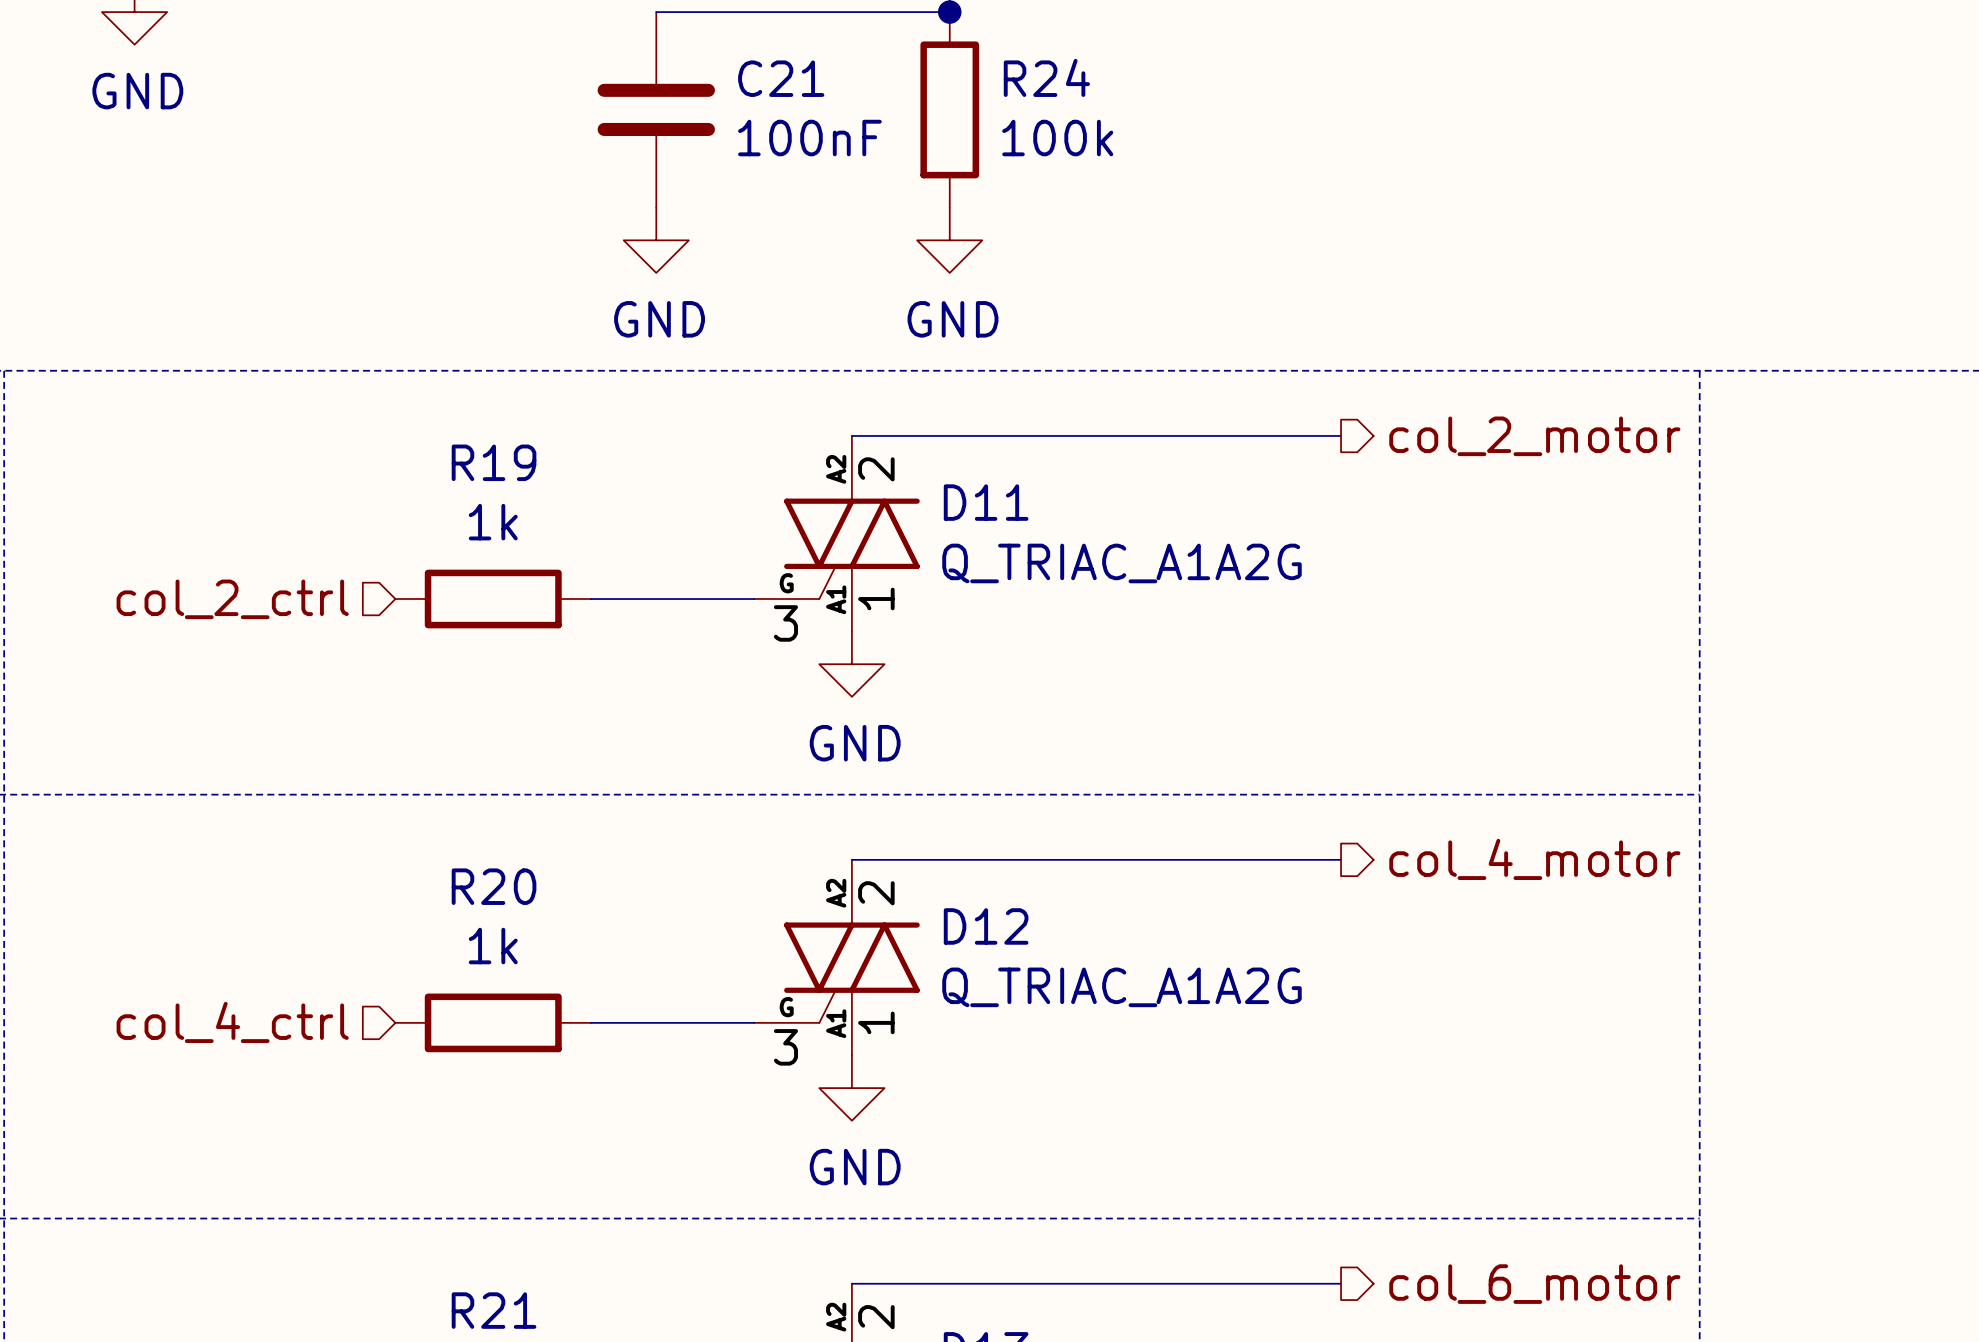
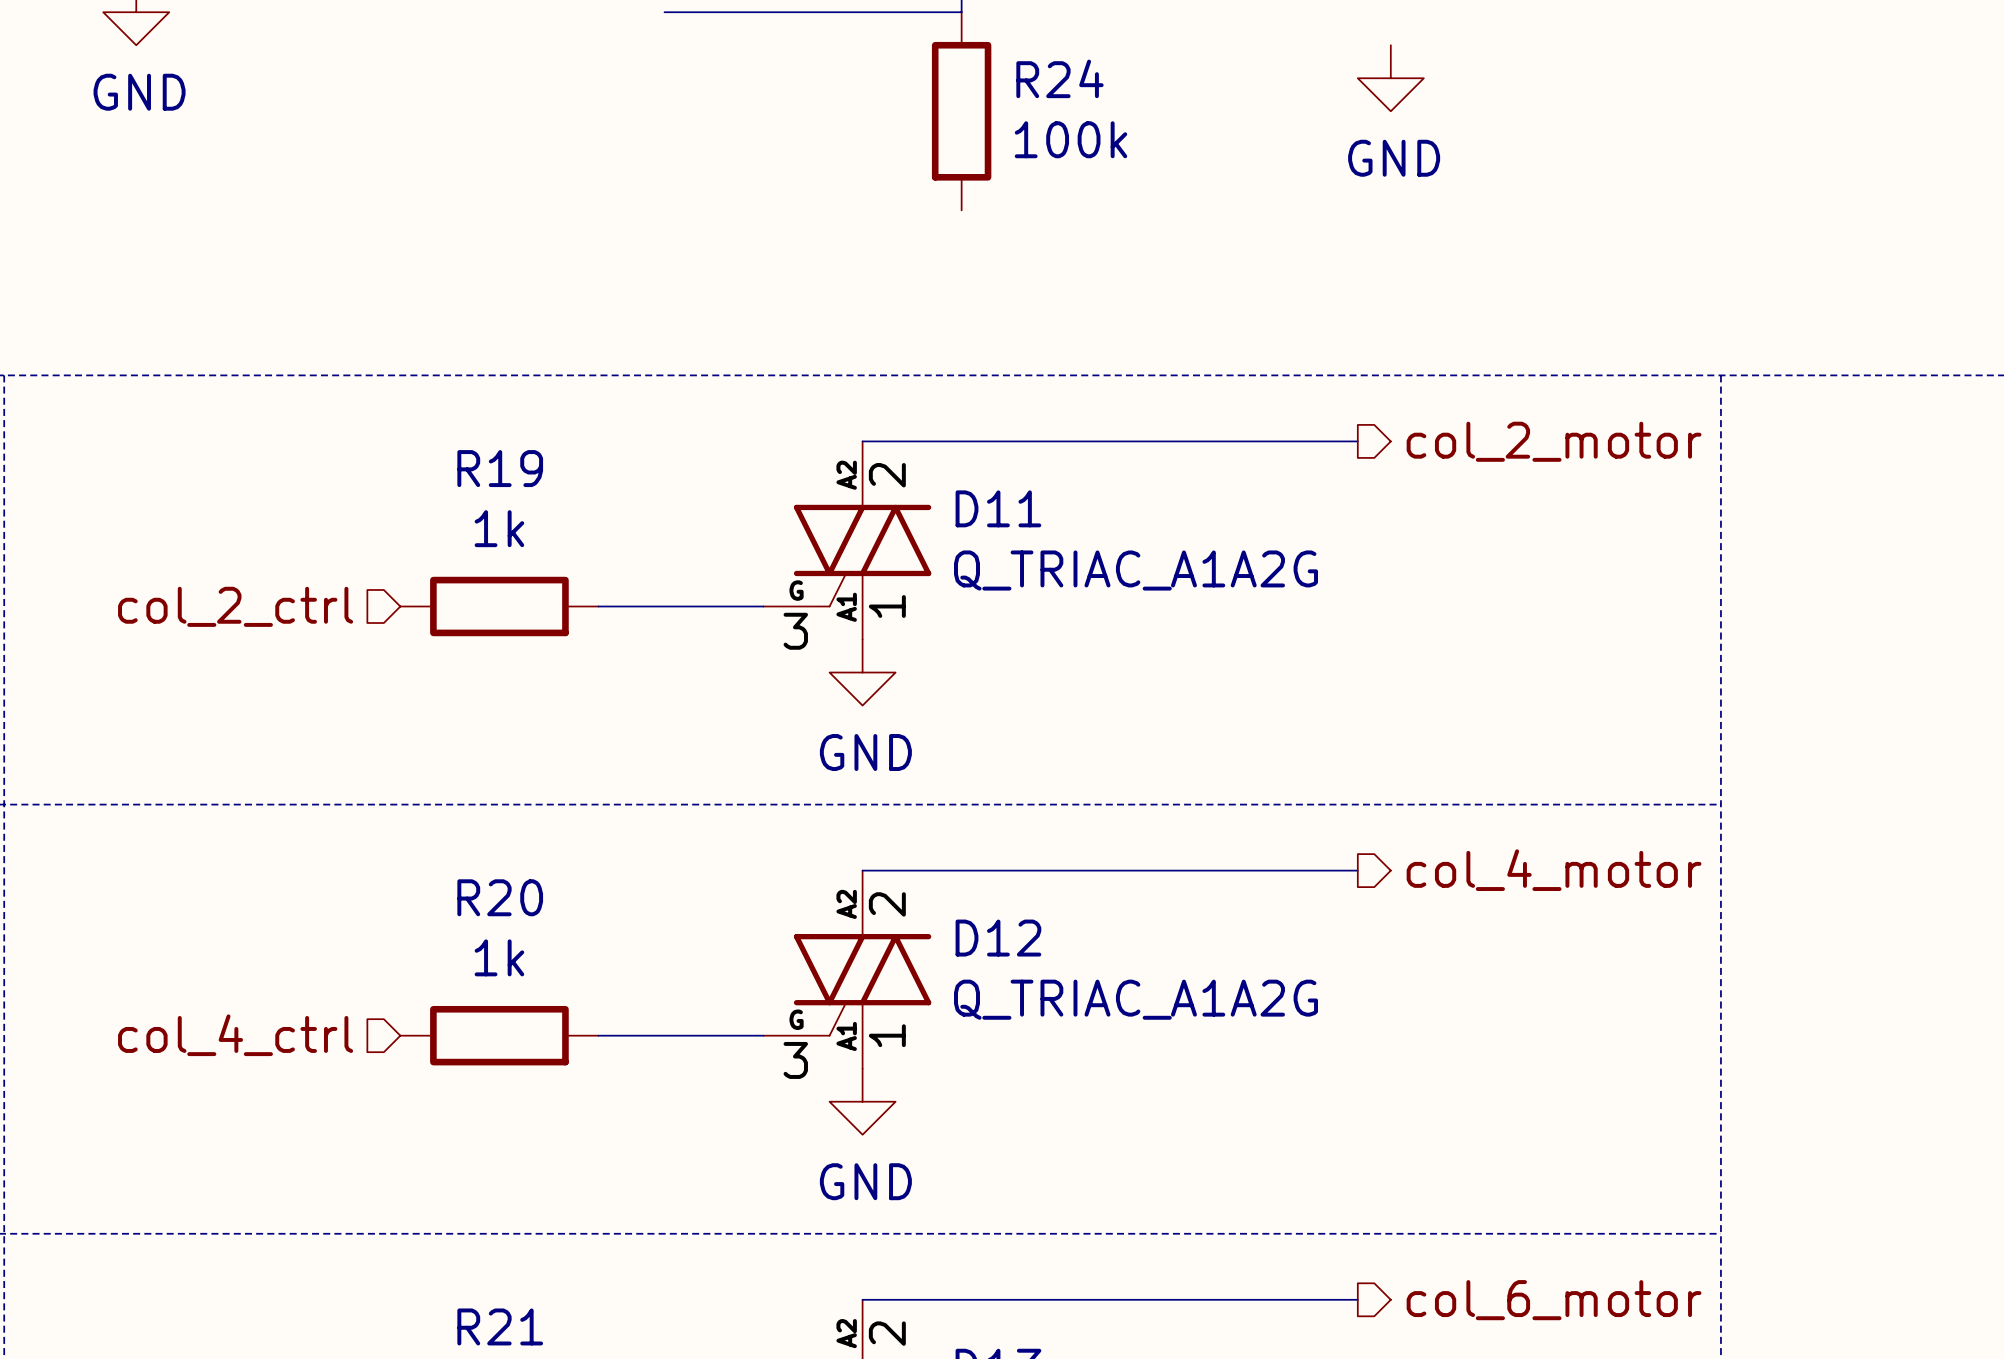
junction: (949, 12) -> none
power symbol: none -> GND (1390, 78)
C21: 100nF (656, 109) -> none
power symbol: GND (656, 240) -> none
power symbol: GND (949, 240) -> none

